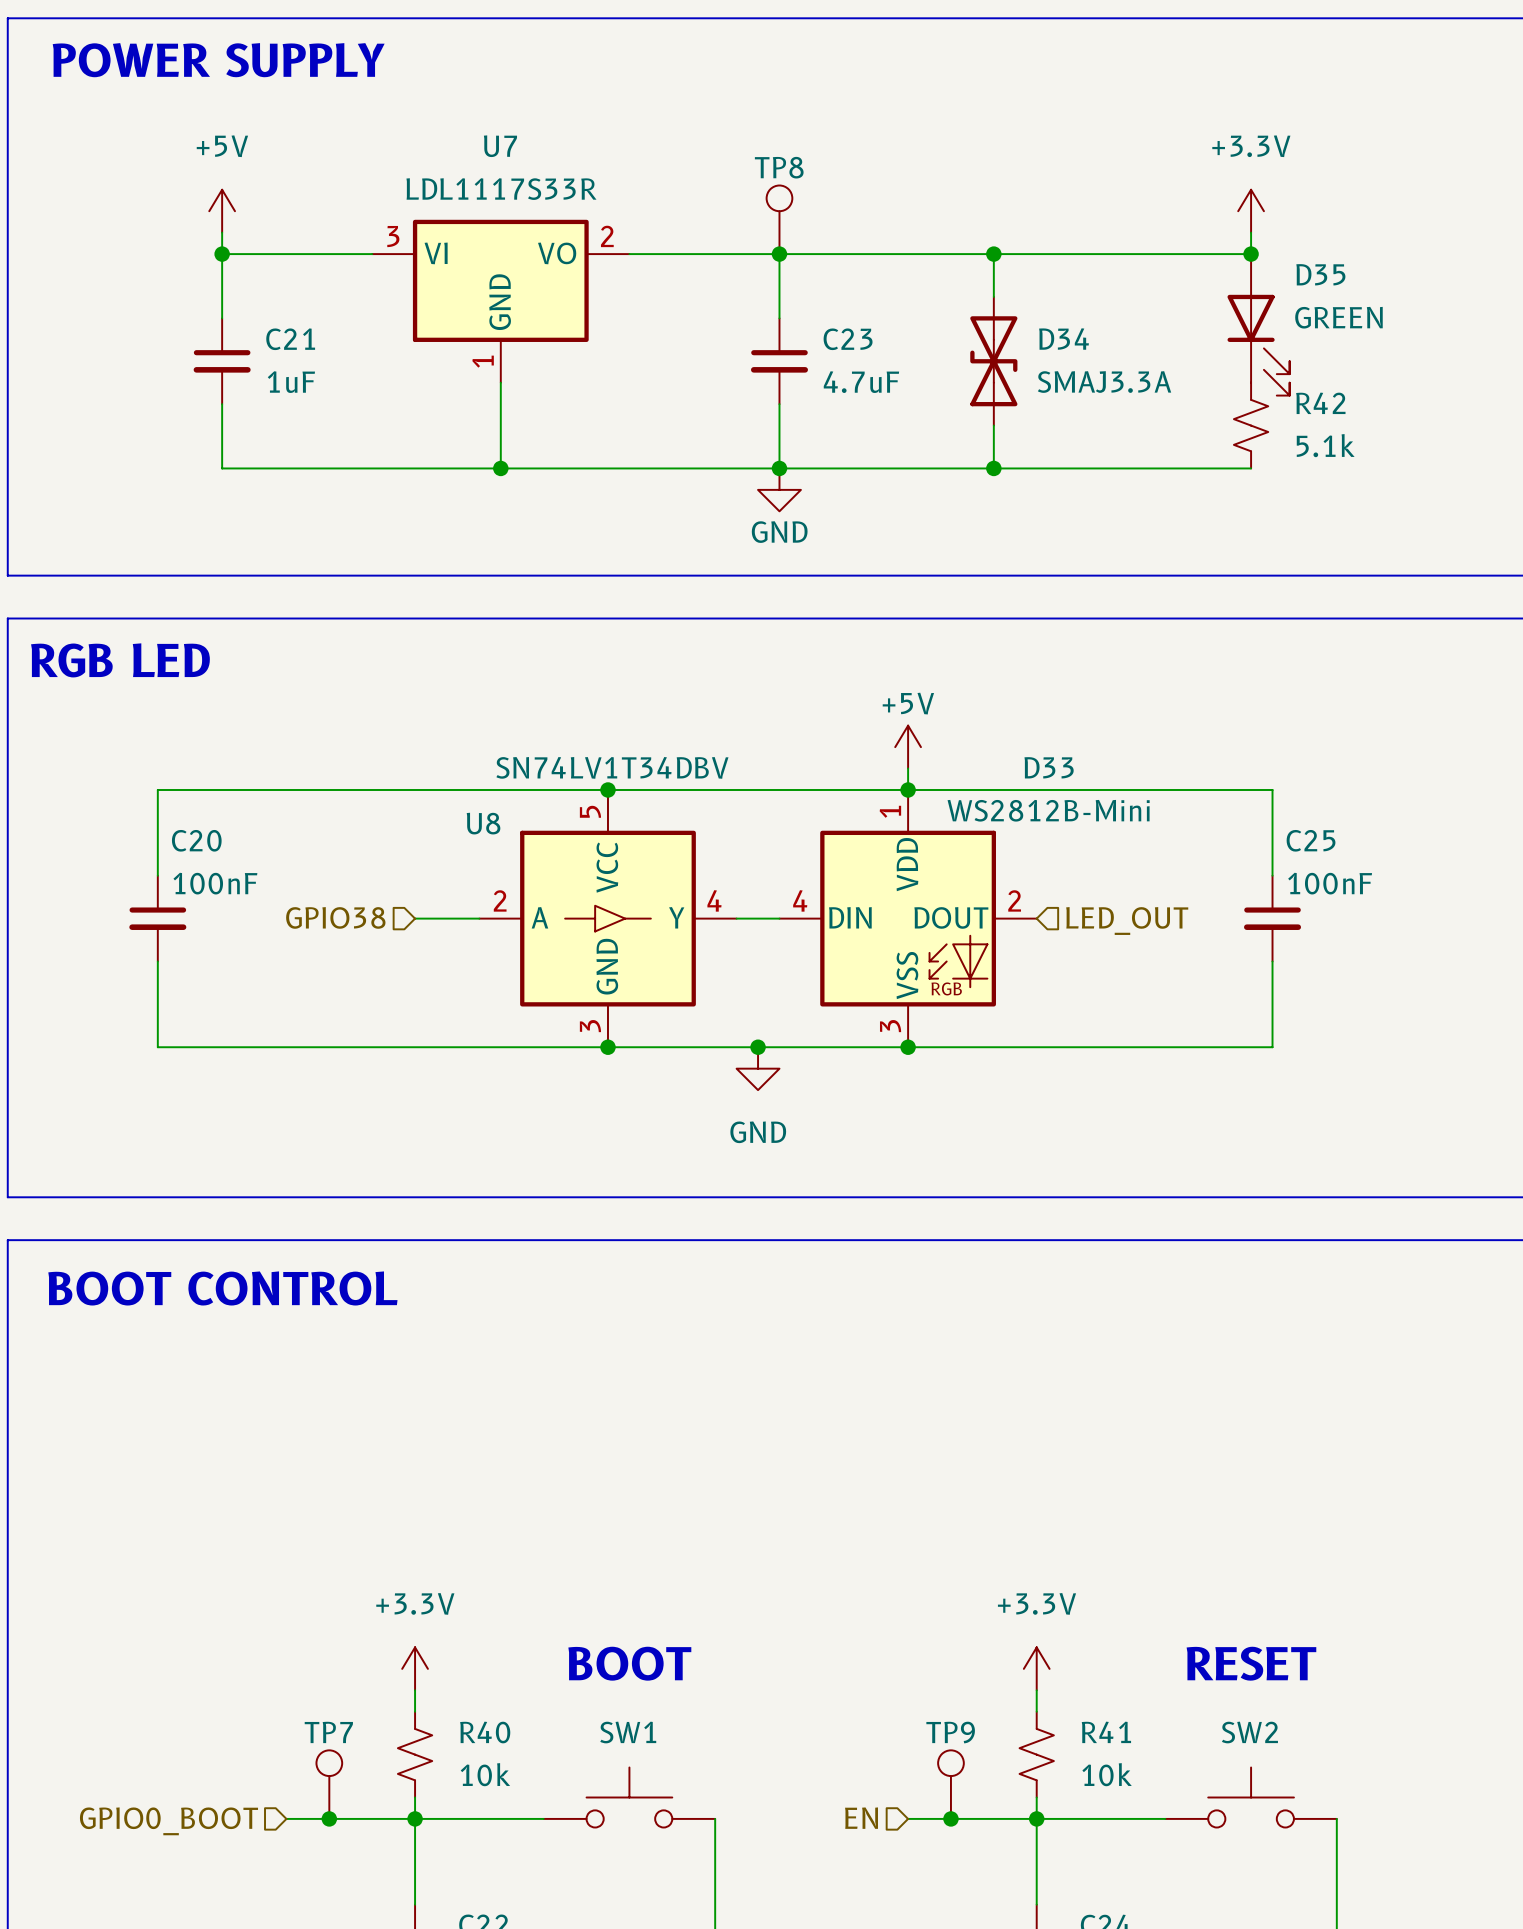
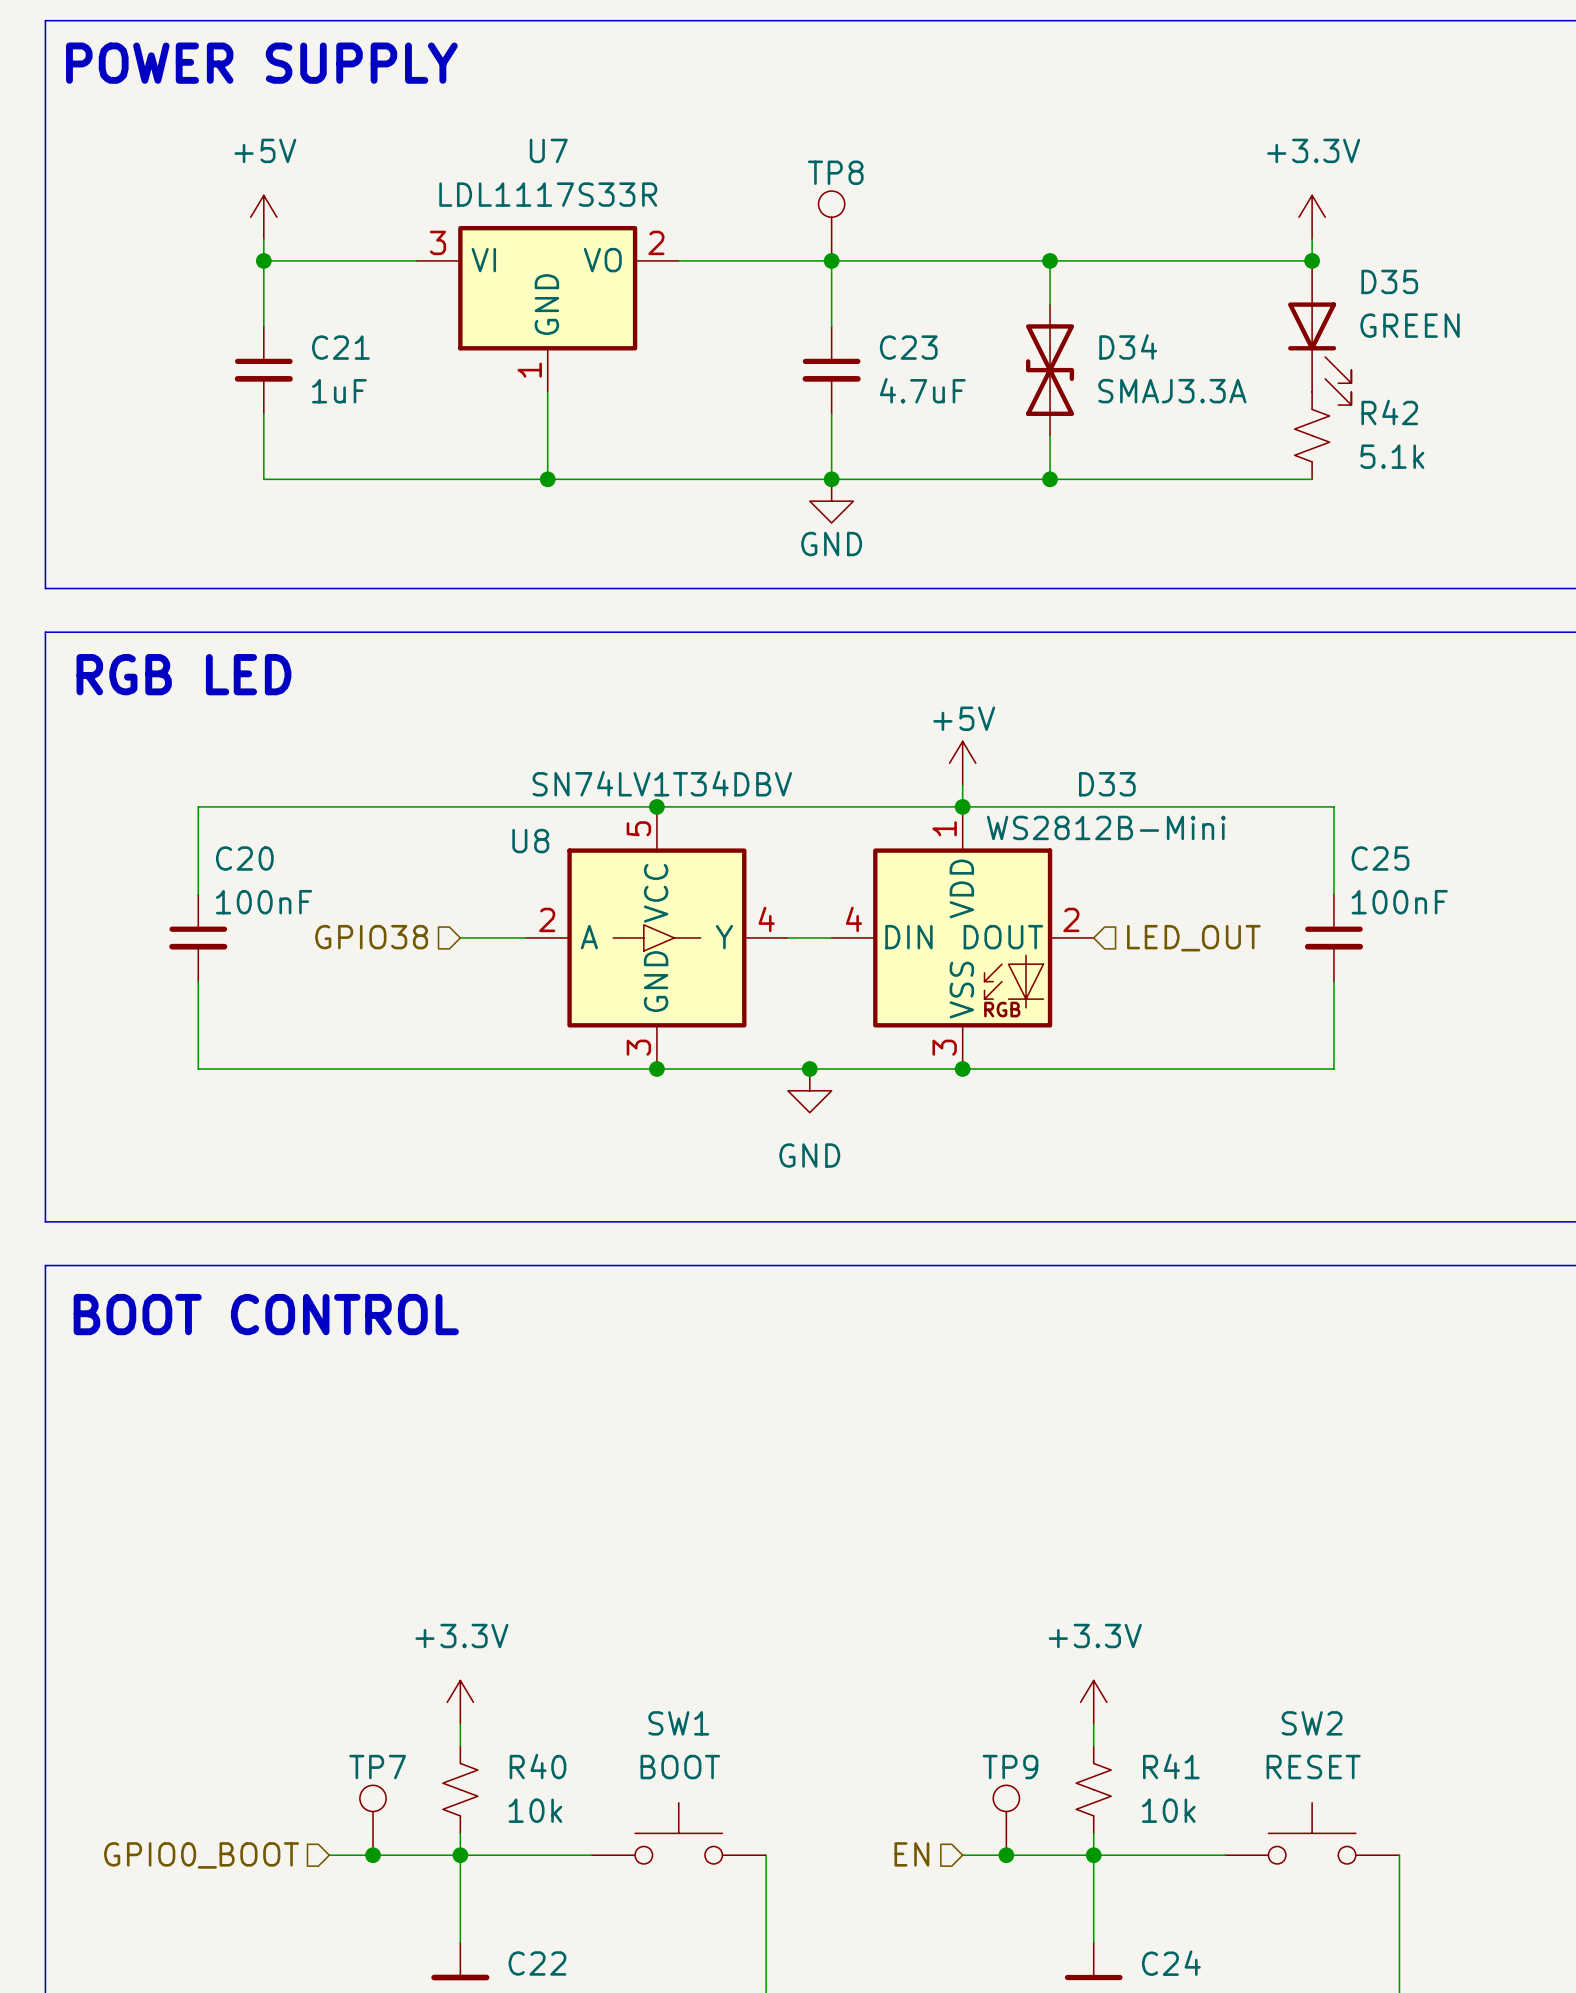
text: BOOT (629, 1663) -> none
text: RESET (1251, 1663) -> none
SW1 name position: SW1 (628, 1732) -> SW1 (678, 1723)
SW1 value: none -> BOOT (680, 1767)
SW2 name position: SW2 (1249, 1732) -> SW2 (1312, 1723)
SW2 value: none -> RESET (1313, 1767)

